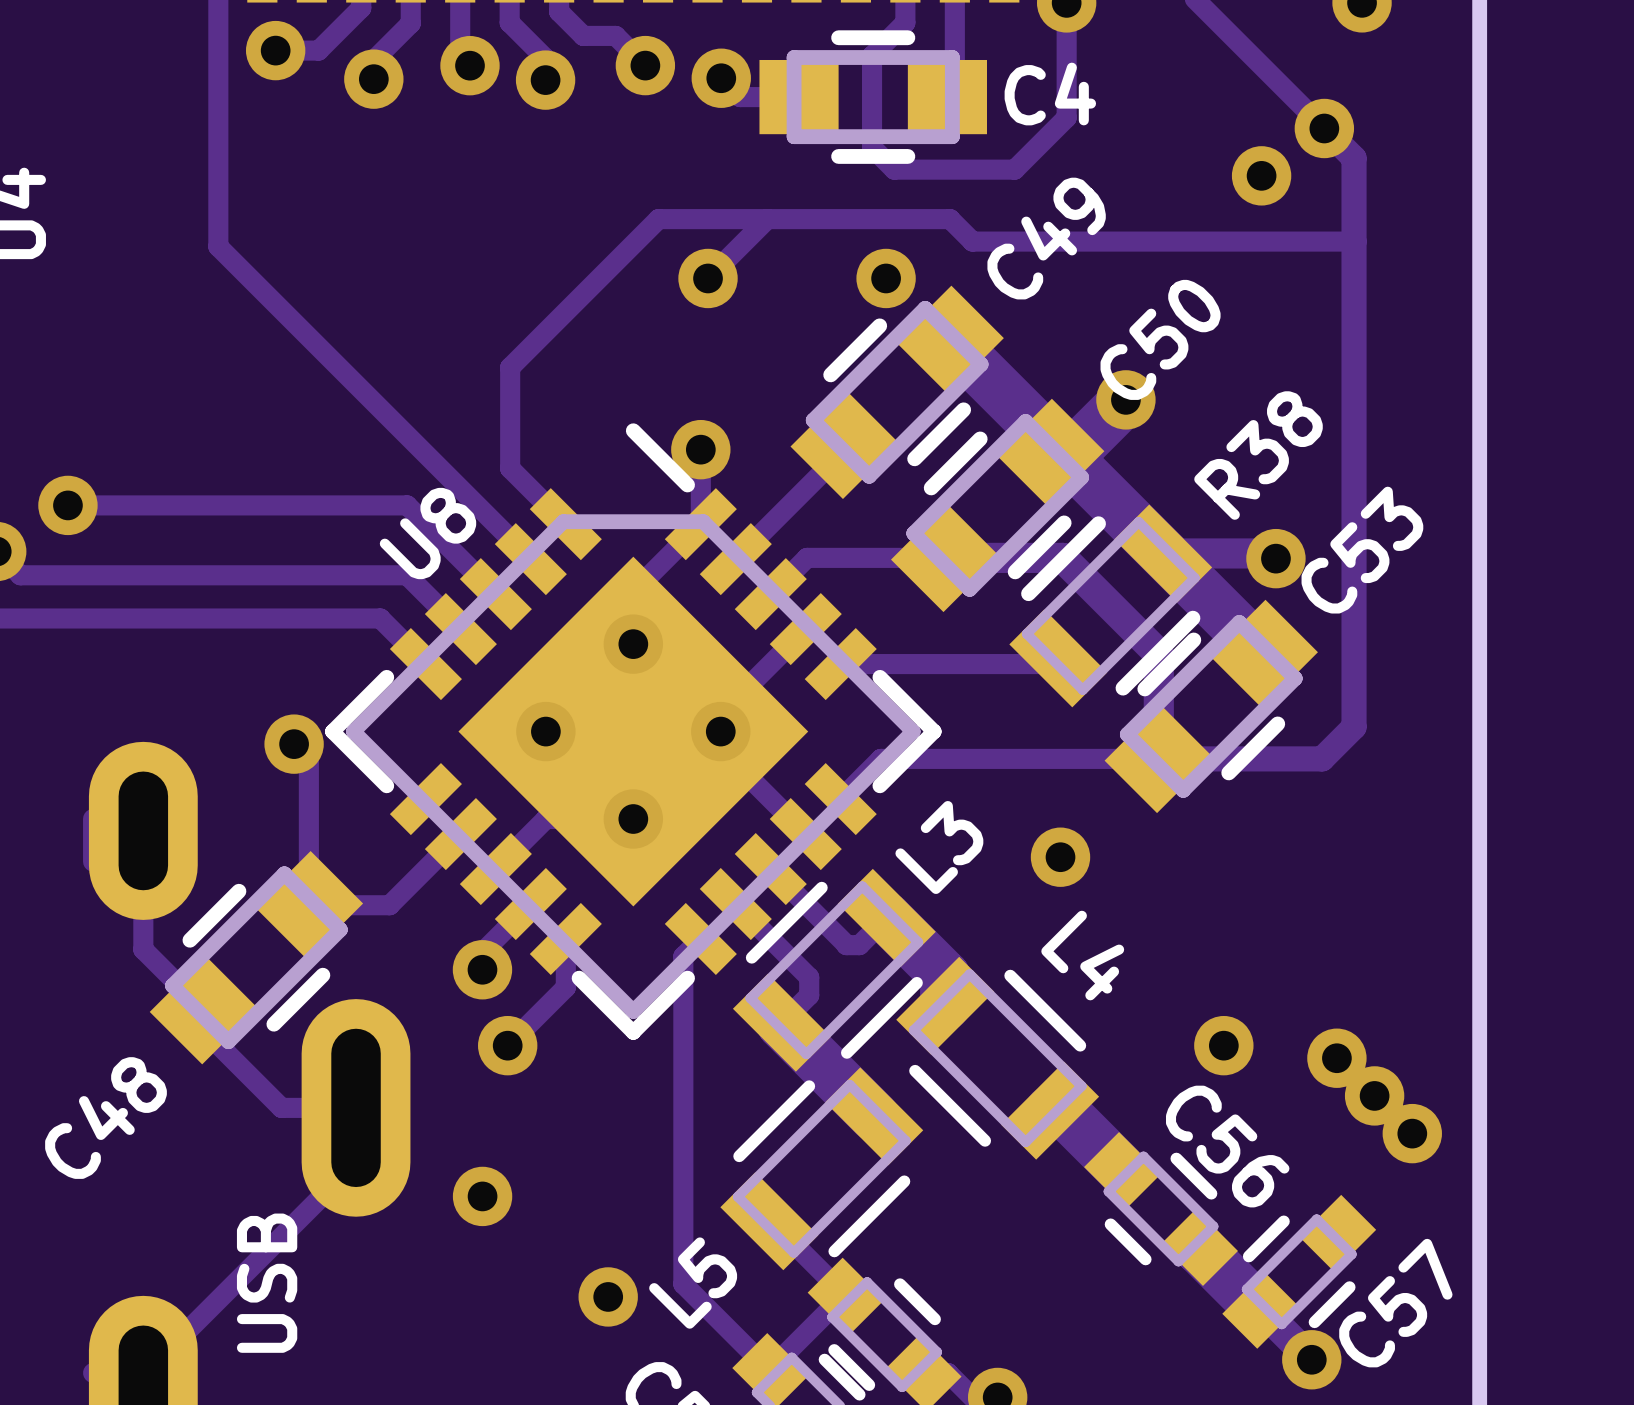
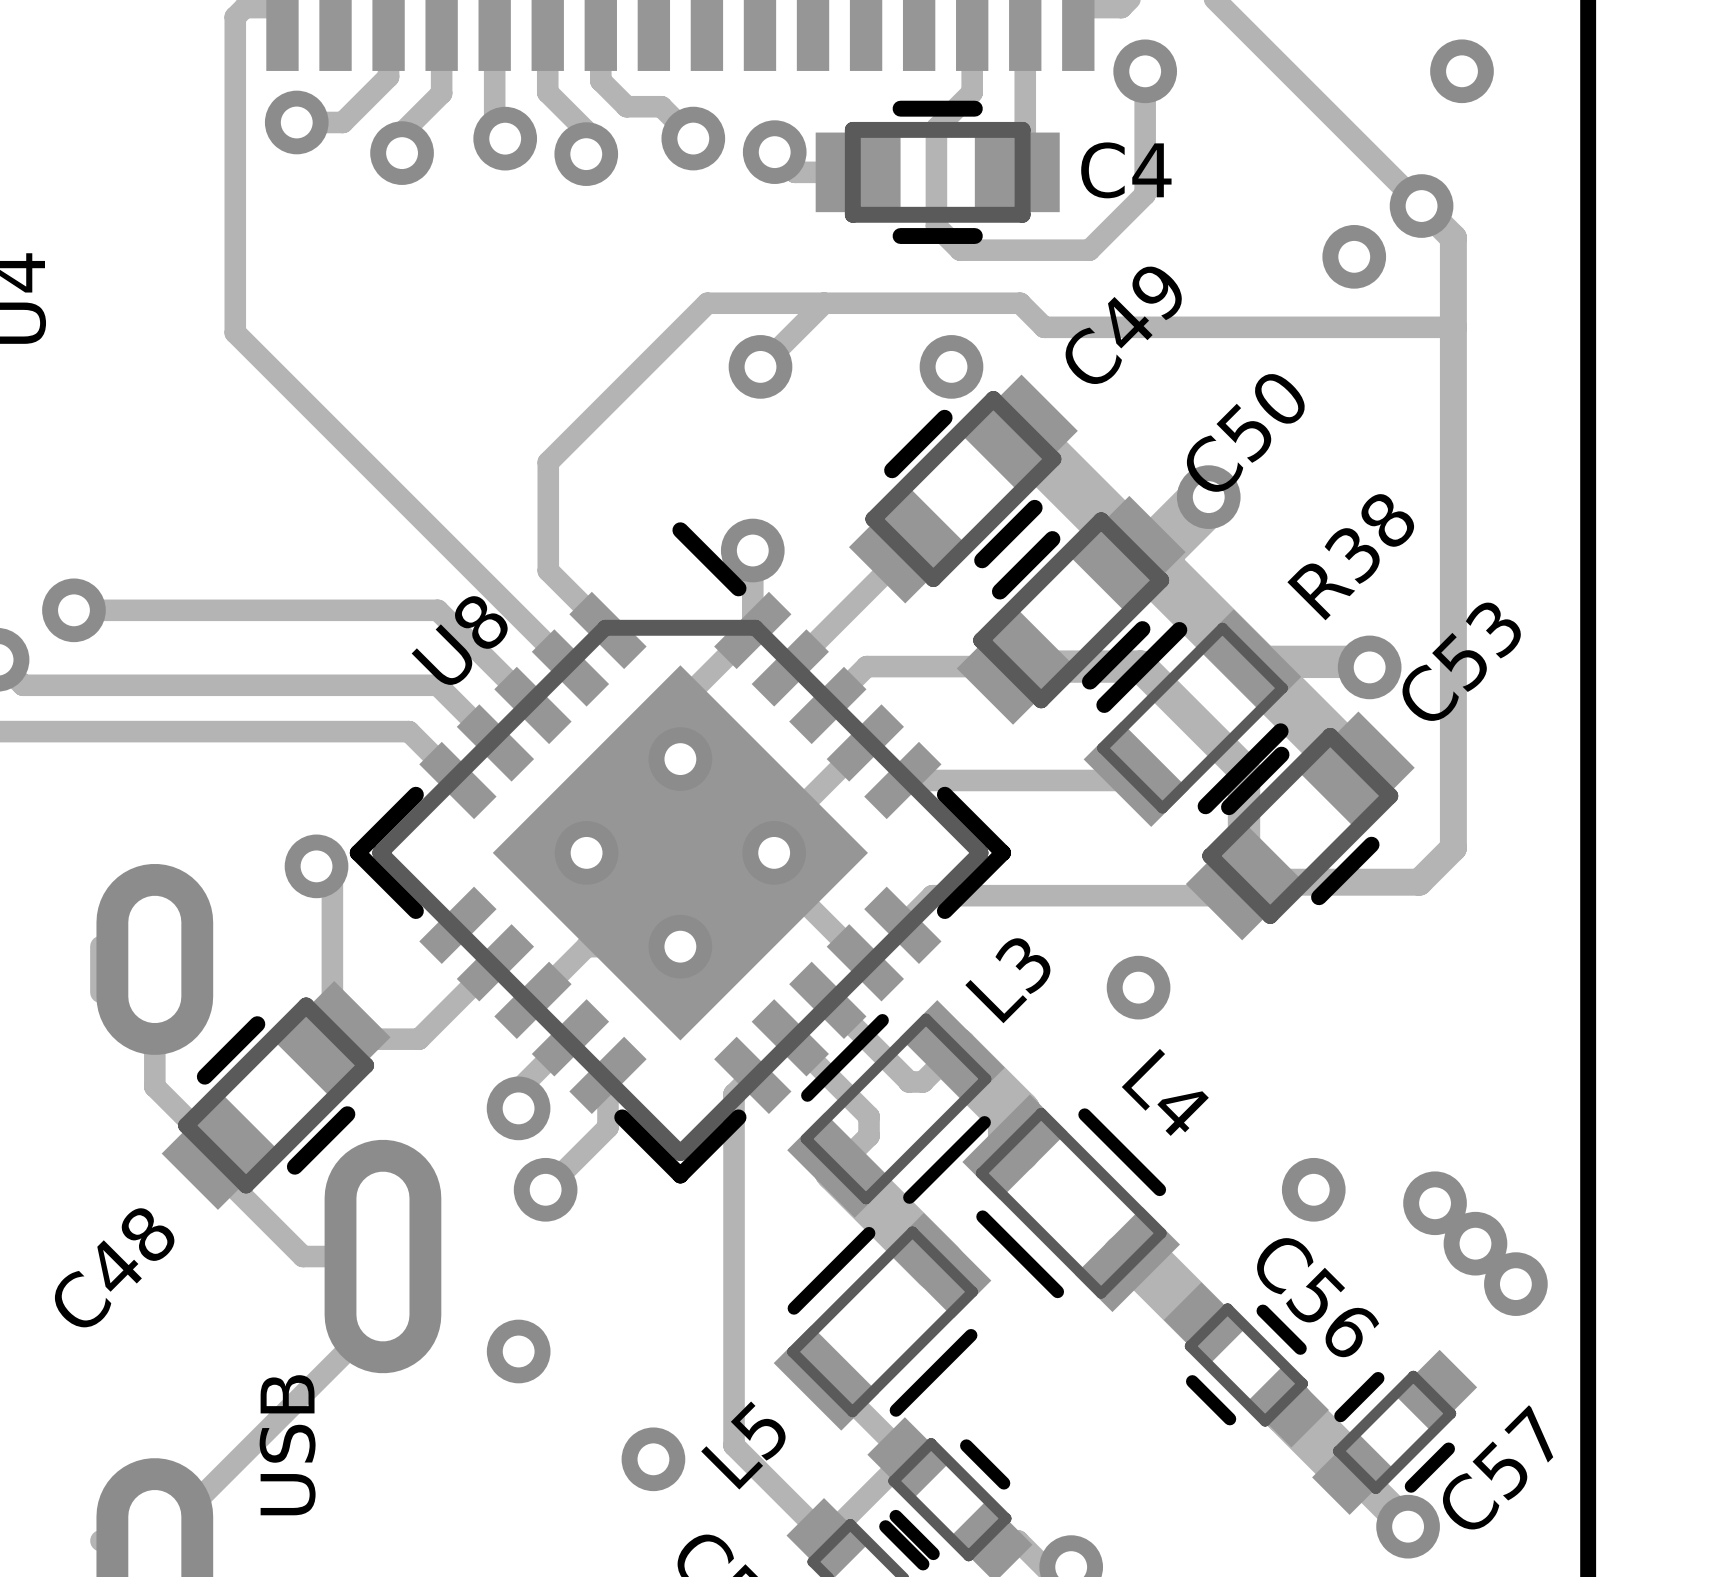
track: (1158, 758) (880, 758) (868, 771) -> (1230, 895) (932, 895)

